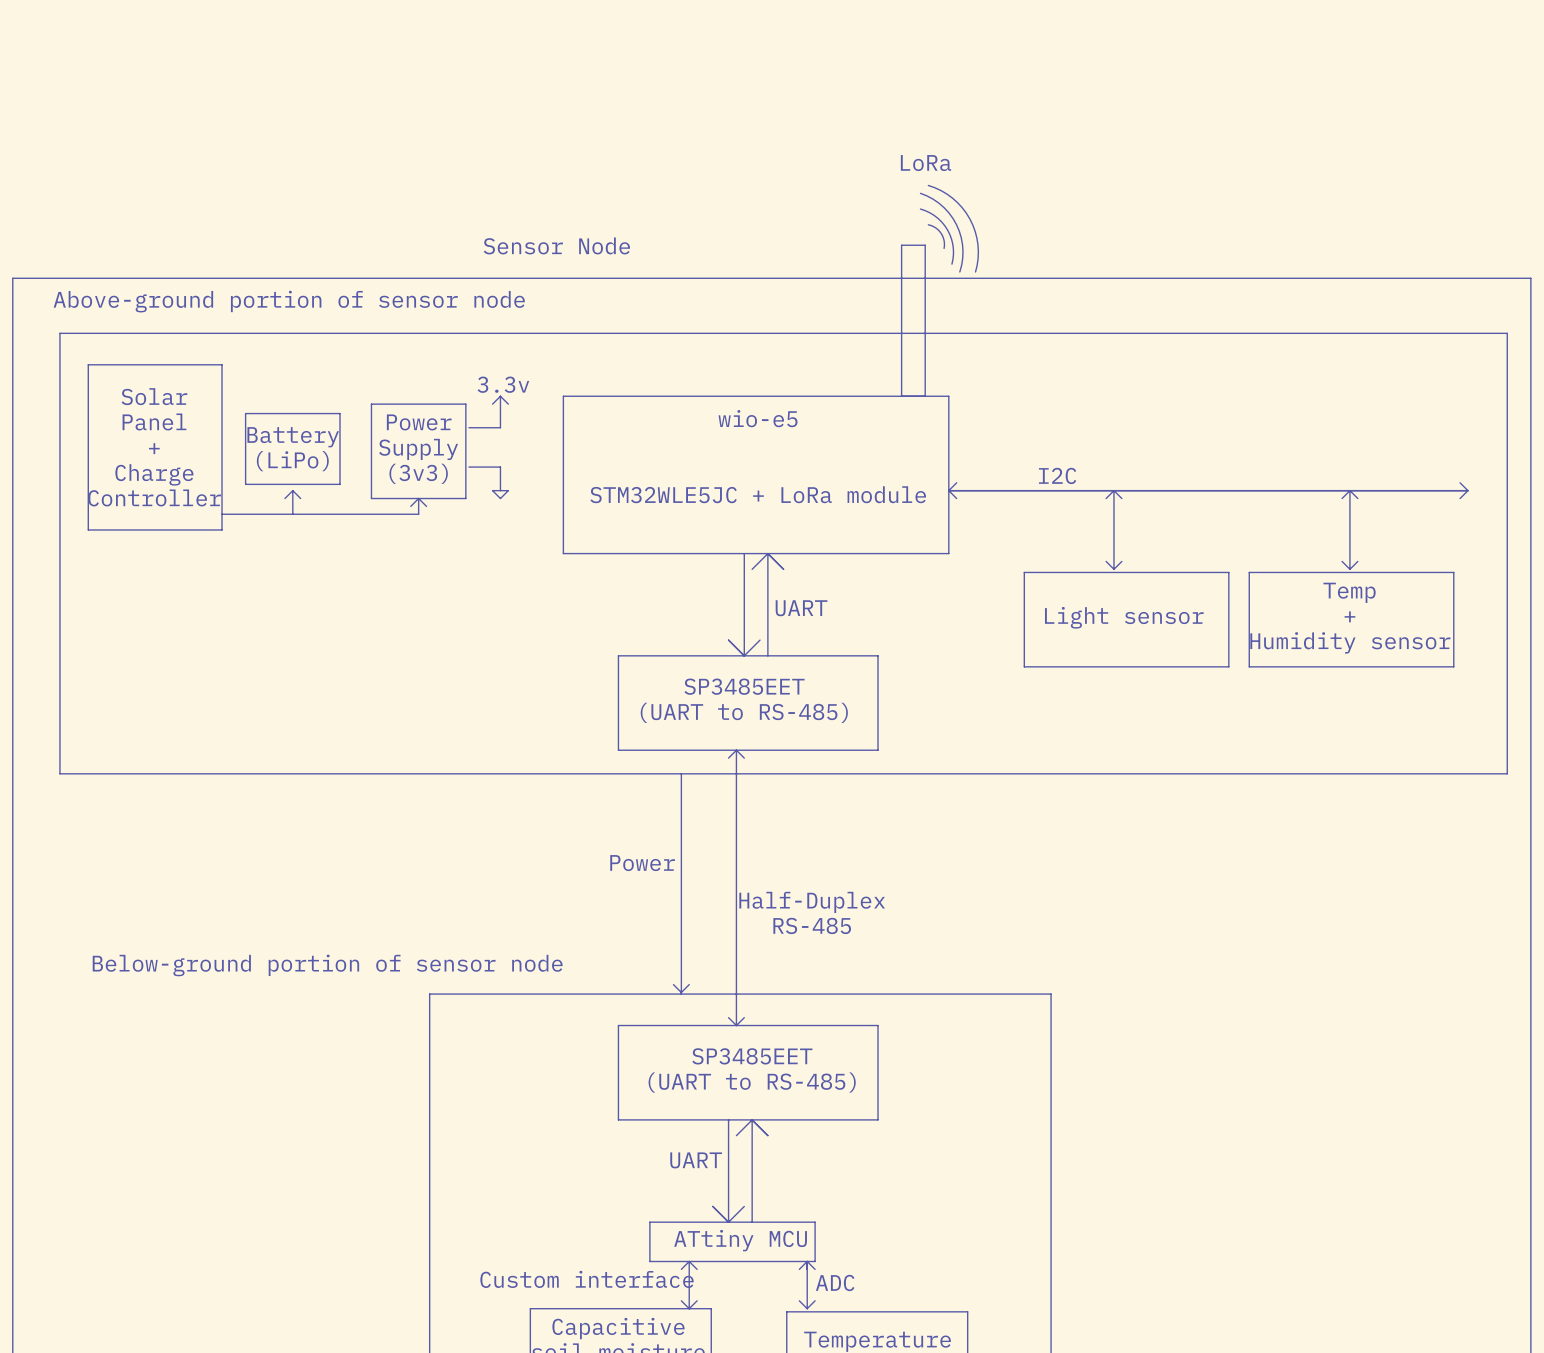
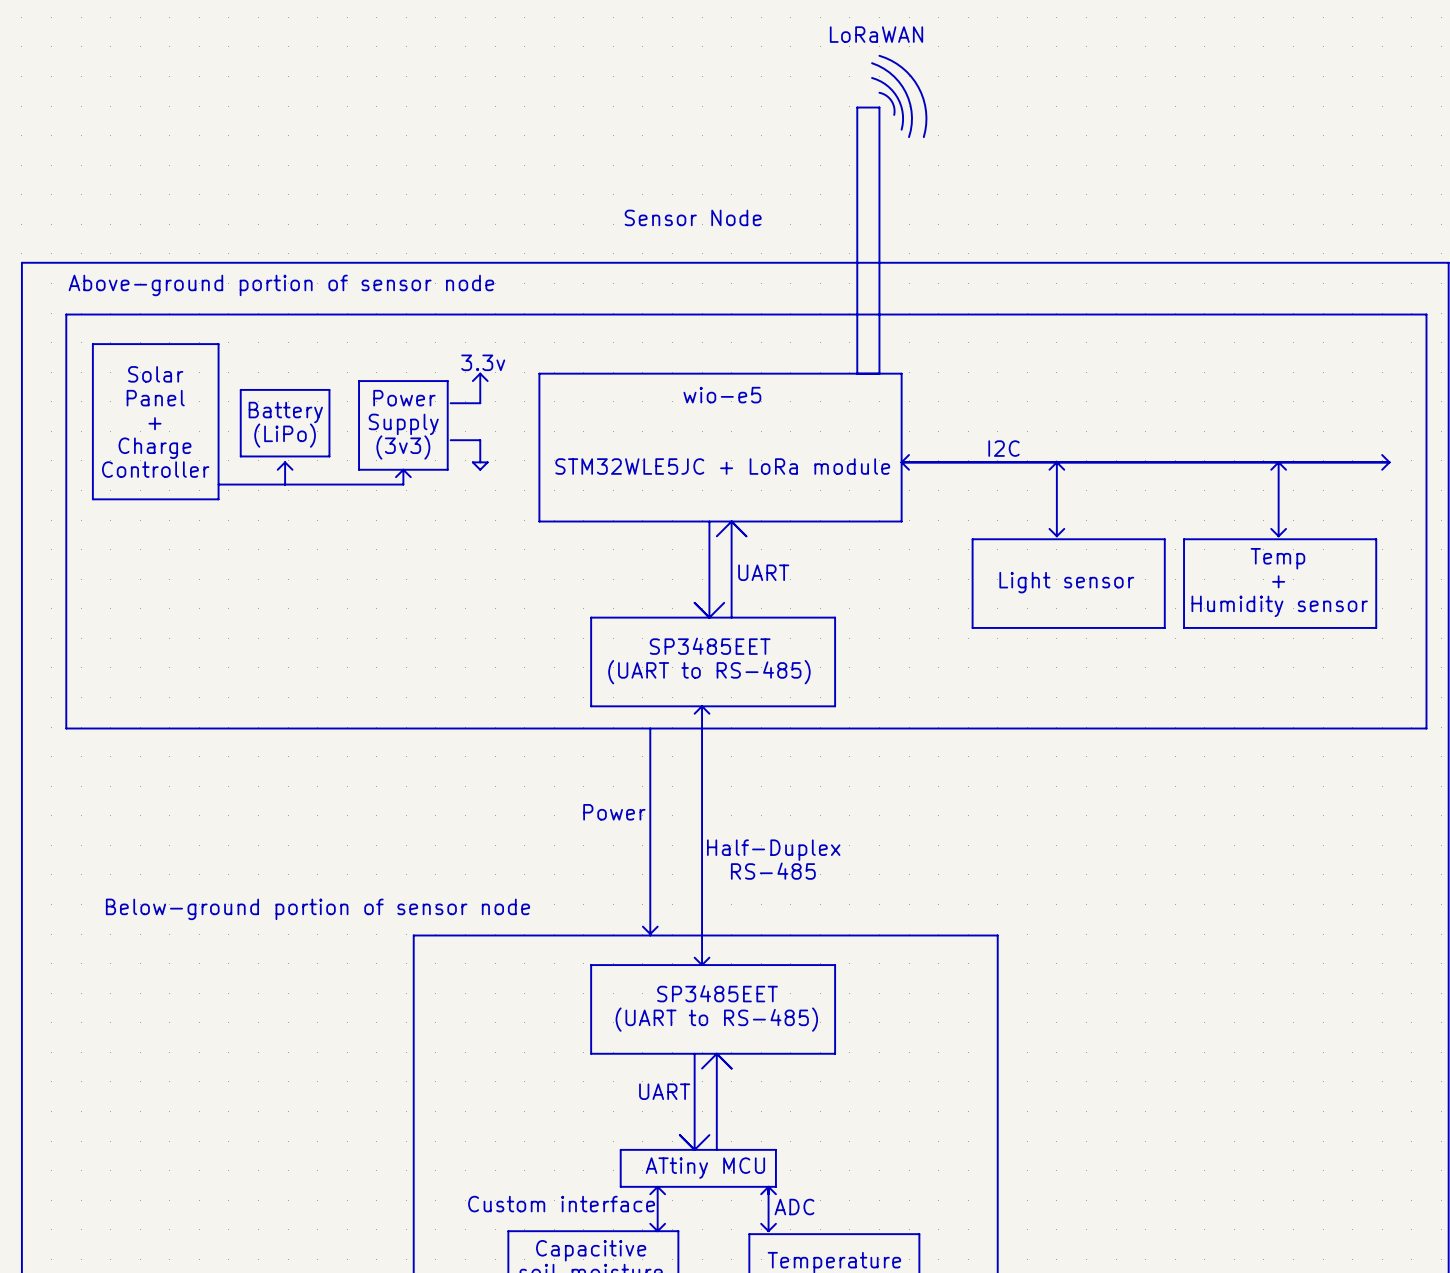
text: none -> LoRaWAN (876, 34)
text: LoRa (925, 163) -> none
line: (928, 185) (952, 198) (969, 218) (977, 244) (975, 271) -> (879, 55) (902, 67) (918, 87) (926, 111) (923, 137)
line: (920, 193) (938, 203) (948, 212) (956, 224) (962, 244) (962, 258) (959, 271) -> (872, 63) (894, 76) (905, 92) (912, 117) (909, 137)
line: (920, 209) (938, 218) (947, 230) (953, 249) (951, 264) -> (872, 77) (884, 83) (897, 97) (902, 110) (901, 129)
line: (928, 224) (935, 227) (941, 233) (944, 240) (944, 248) -> (879, 92) (891, 100) (894, 114)
text position: Sensor Node (556, 245) -> Sensor Node (693, 217)
line: (901, 245) (925, 245) -> (857, 231) (857, 107) (879, 107) (879, 231)

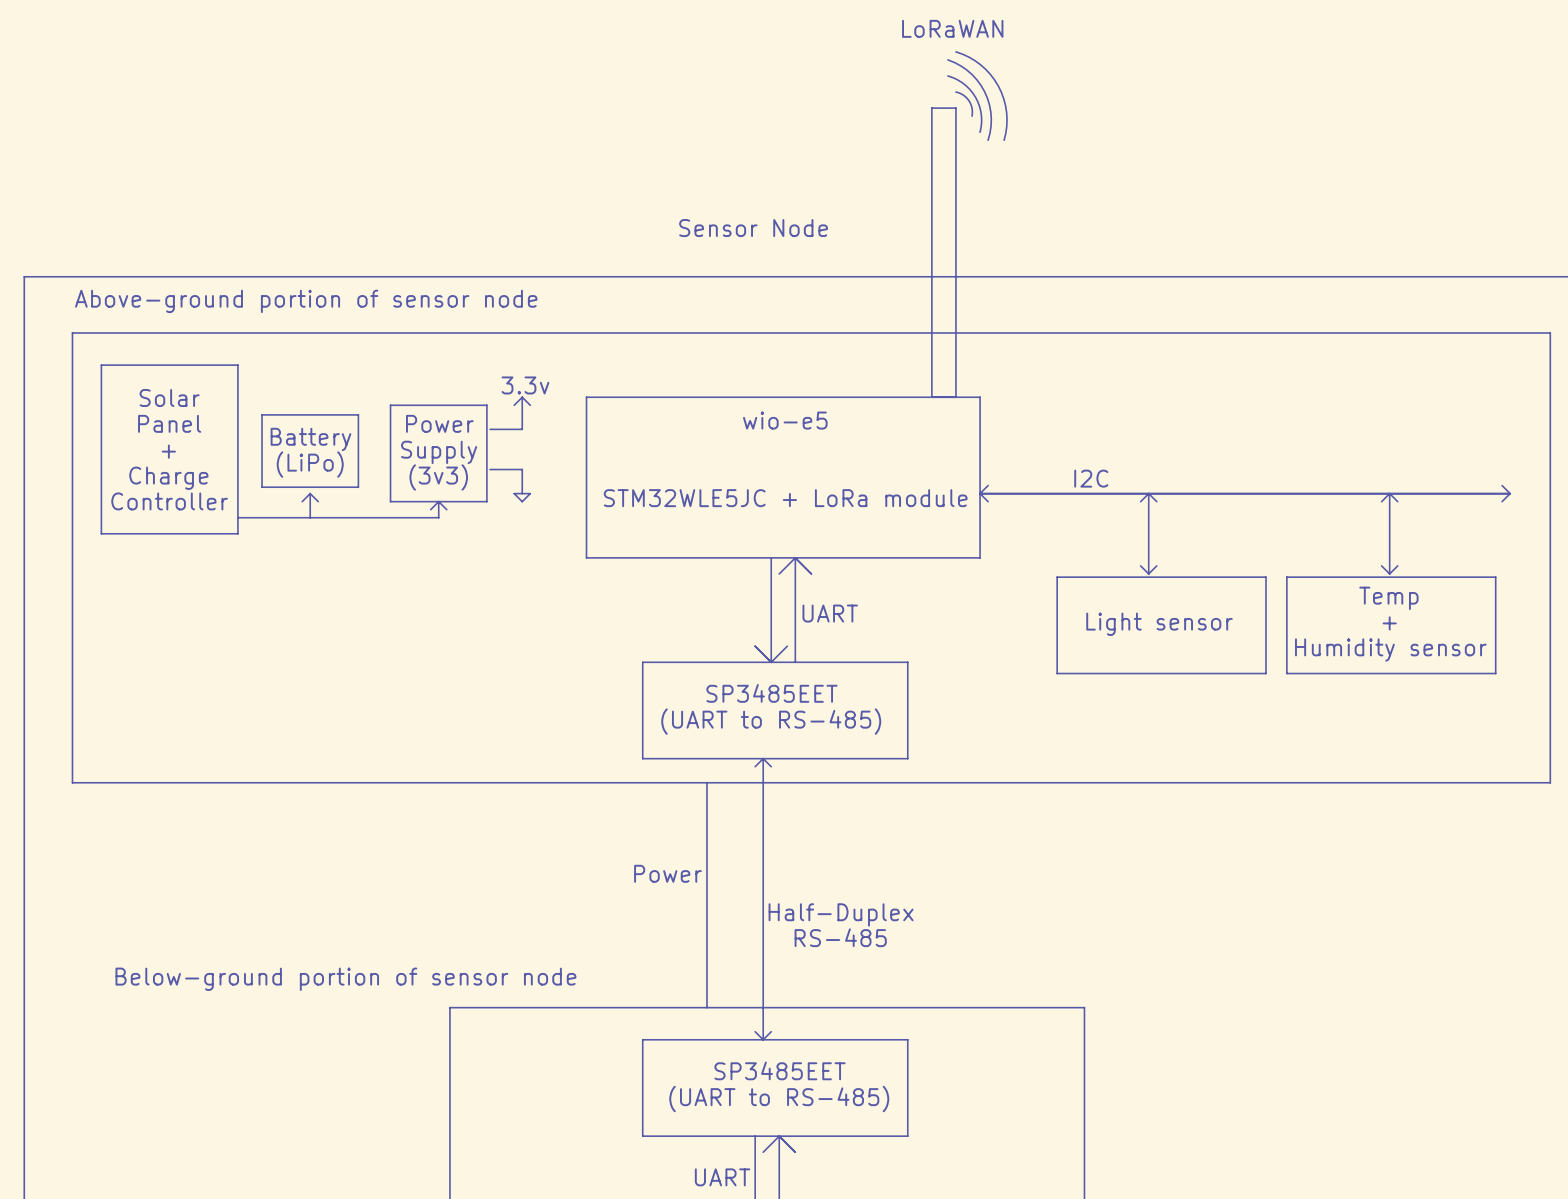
line: (642, 926) (650, 934) (657, 926) -> none

